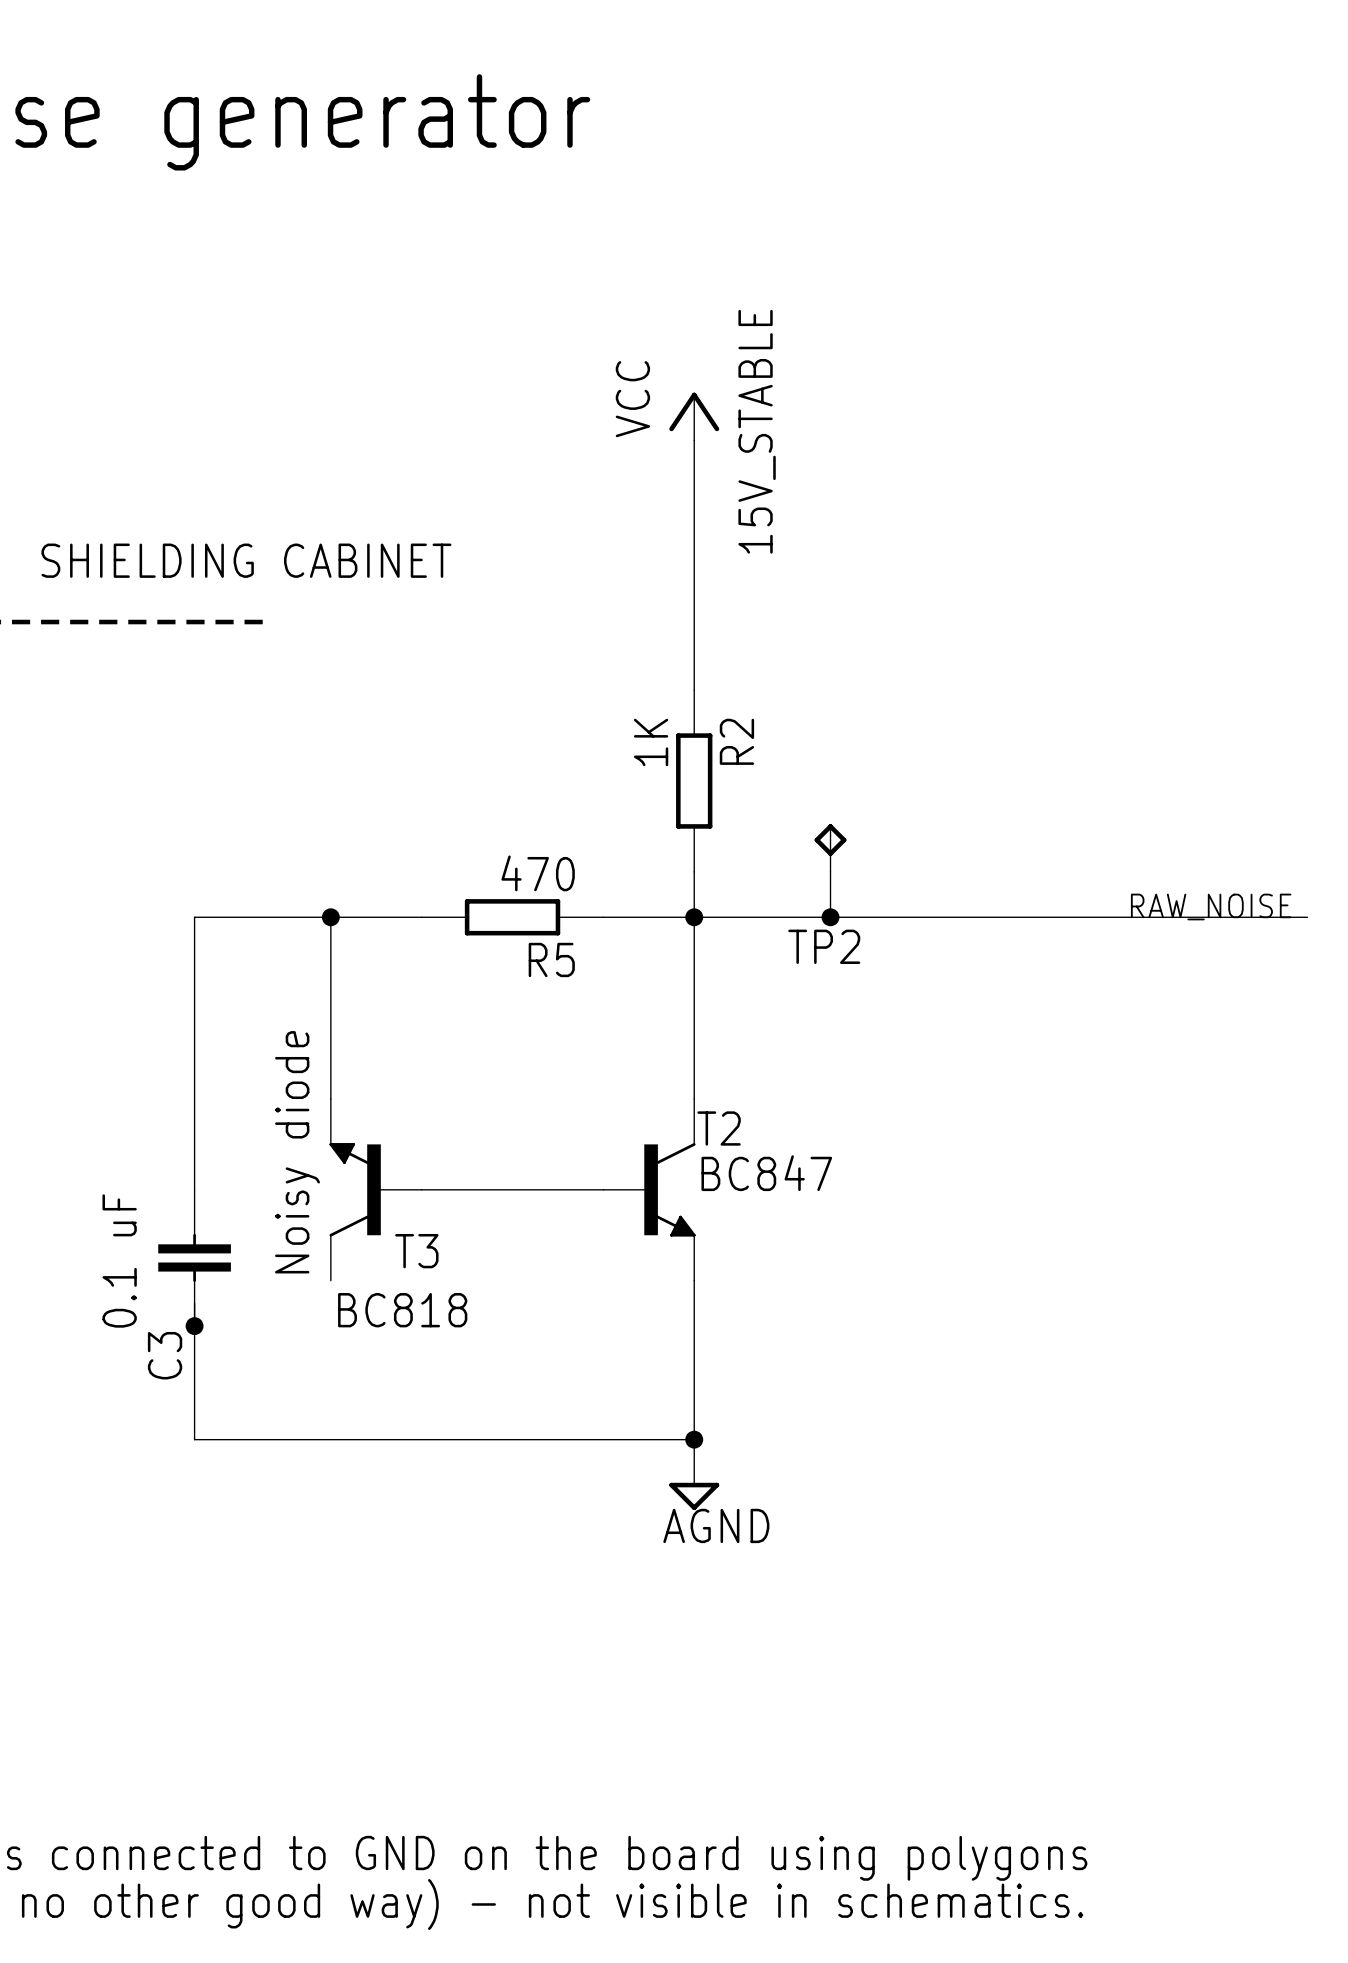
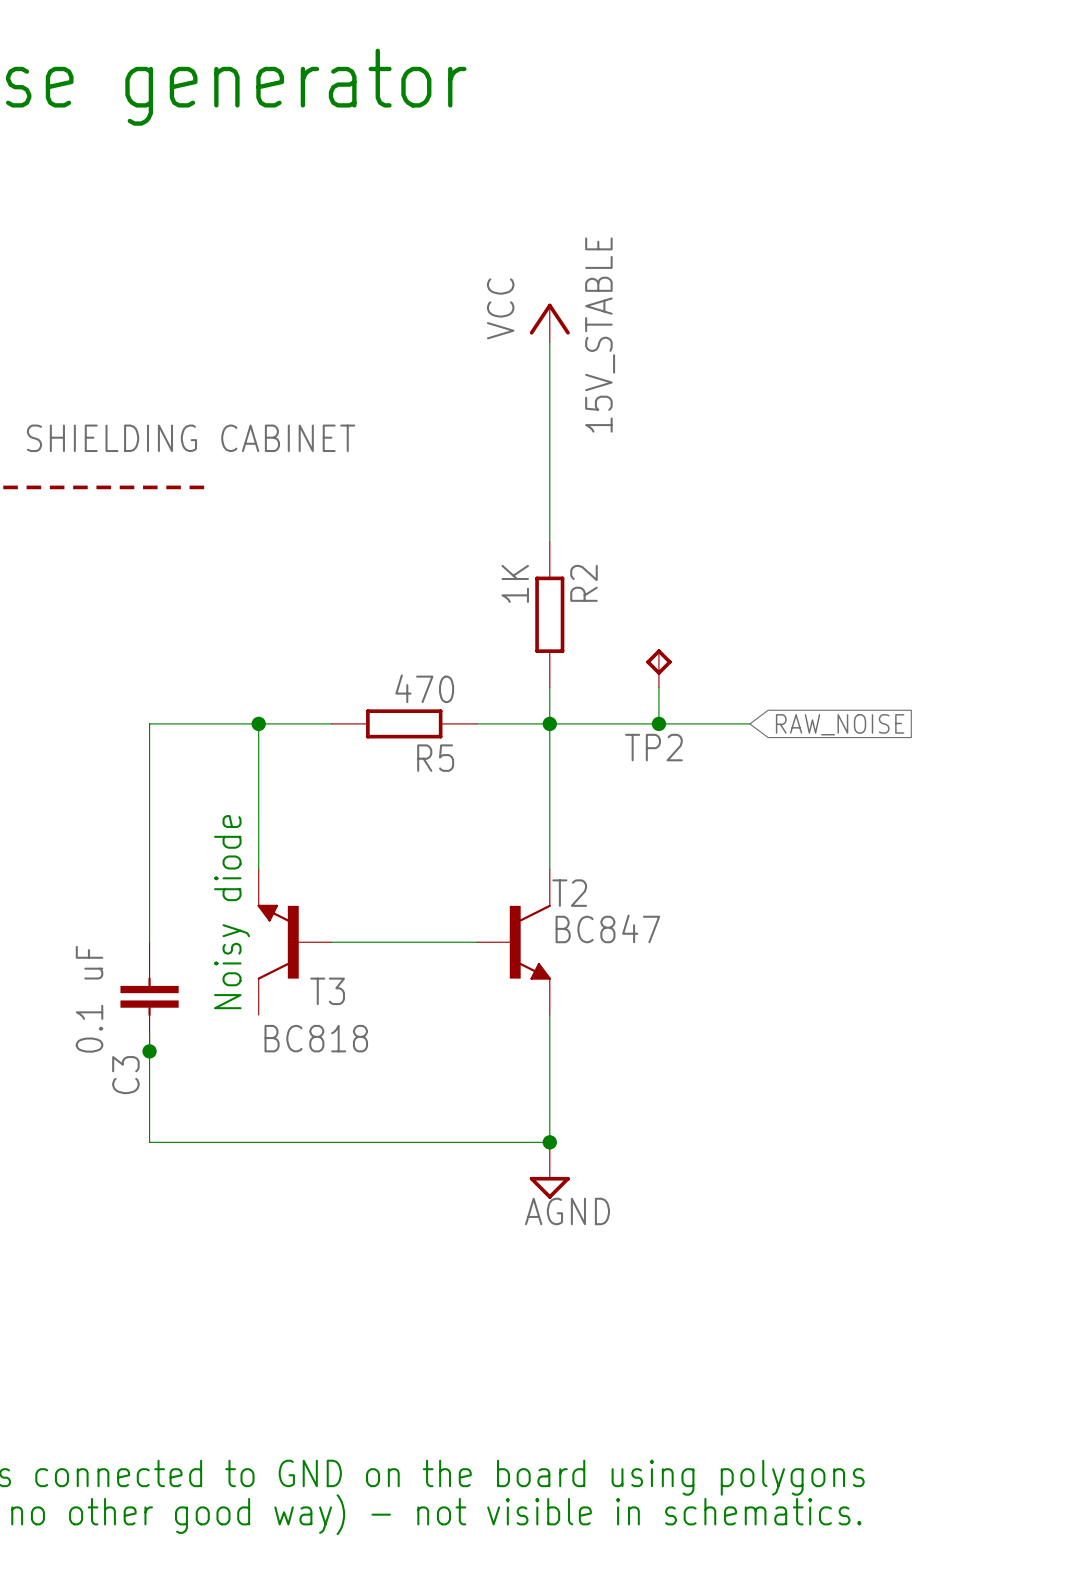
label: RAW_NOISE (1211, 907) -> none
wire: (944, 917) (1307, 917) -> none
global label: none -> RAW_NOISE (840, 724)

